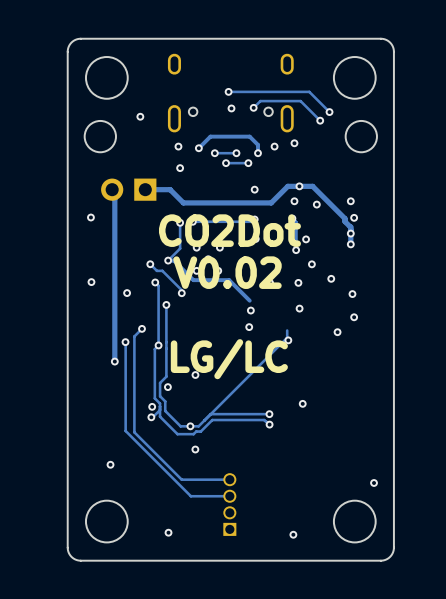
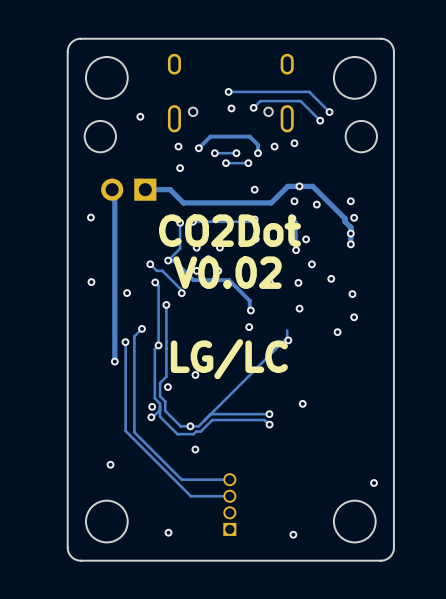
track: none -> (249, 300) (250, 310)

